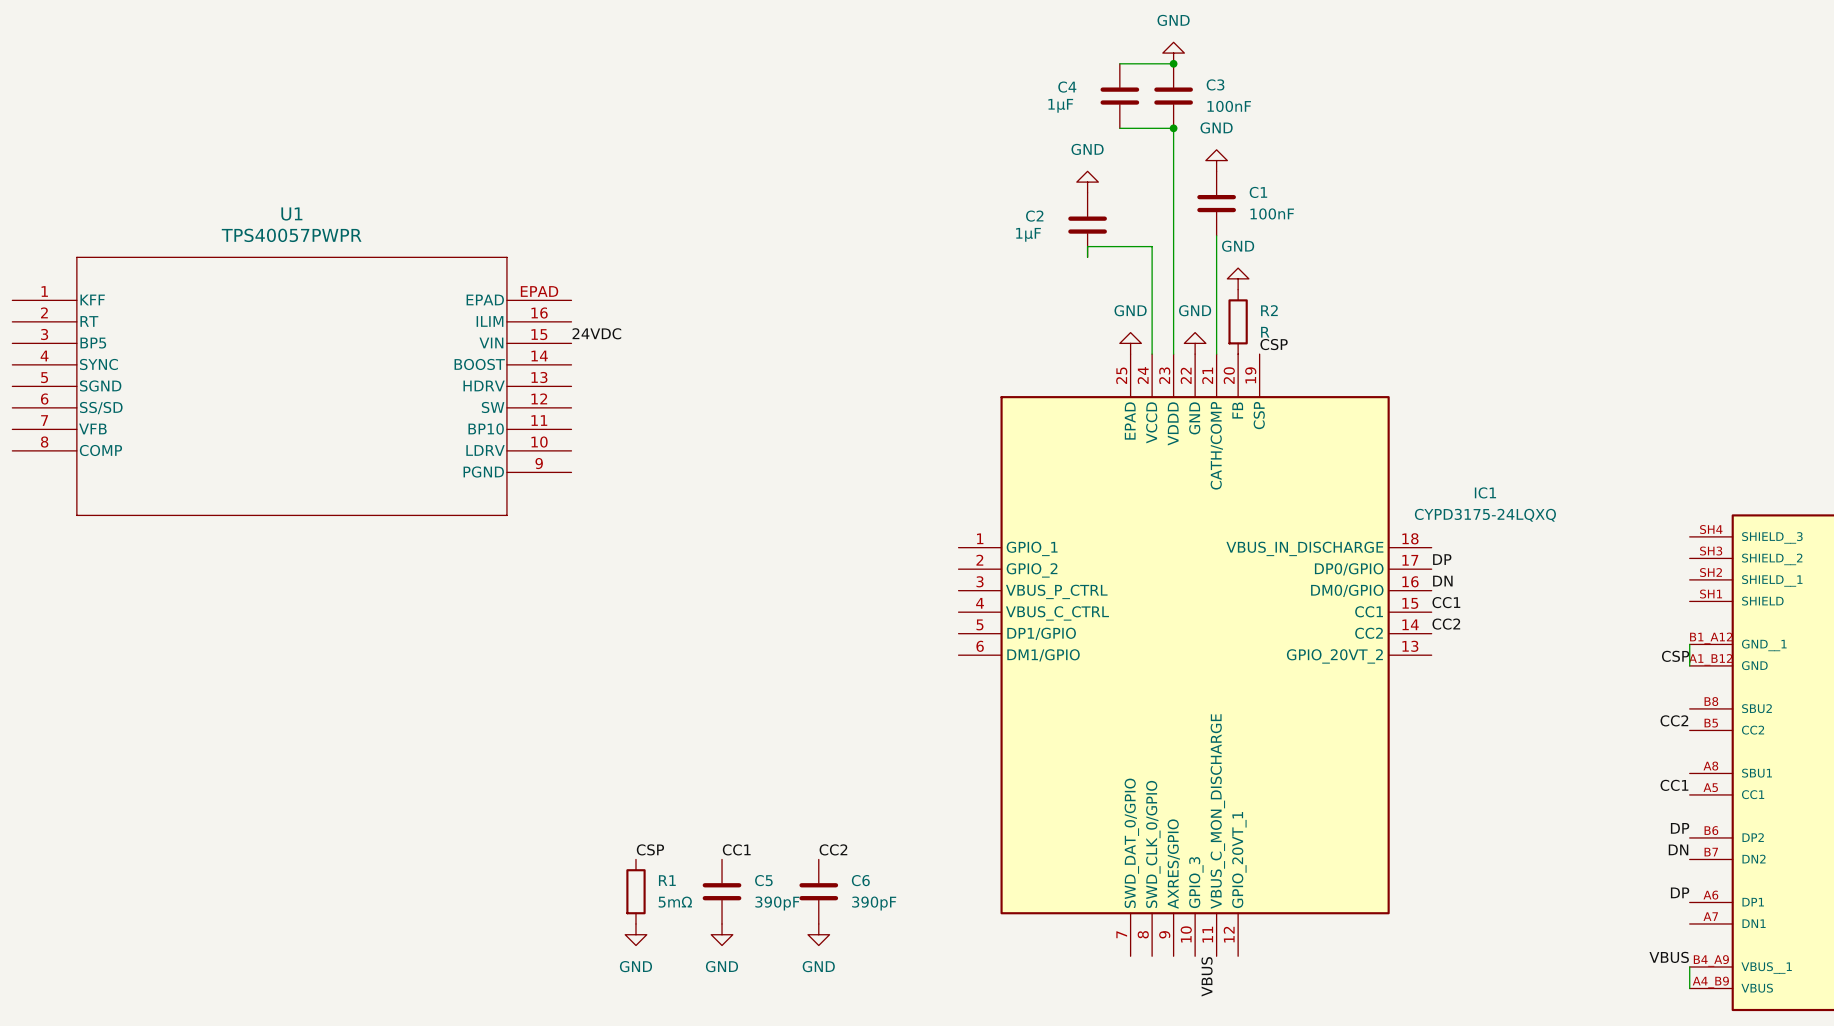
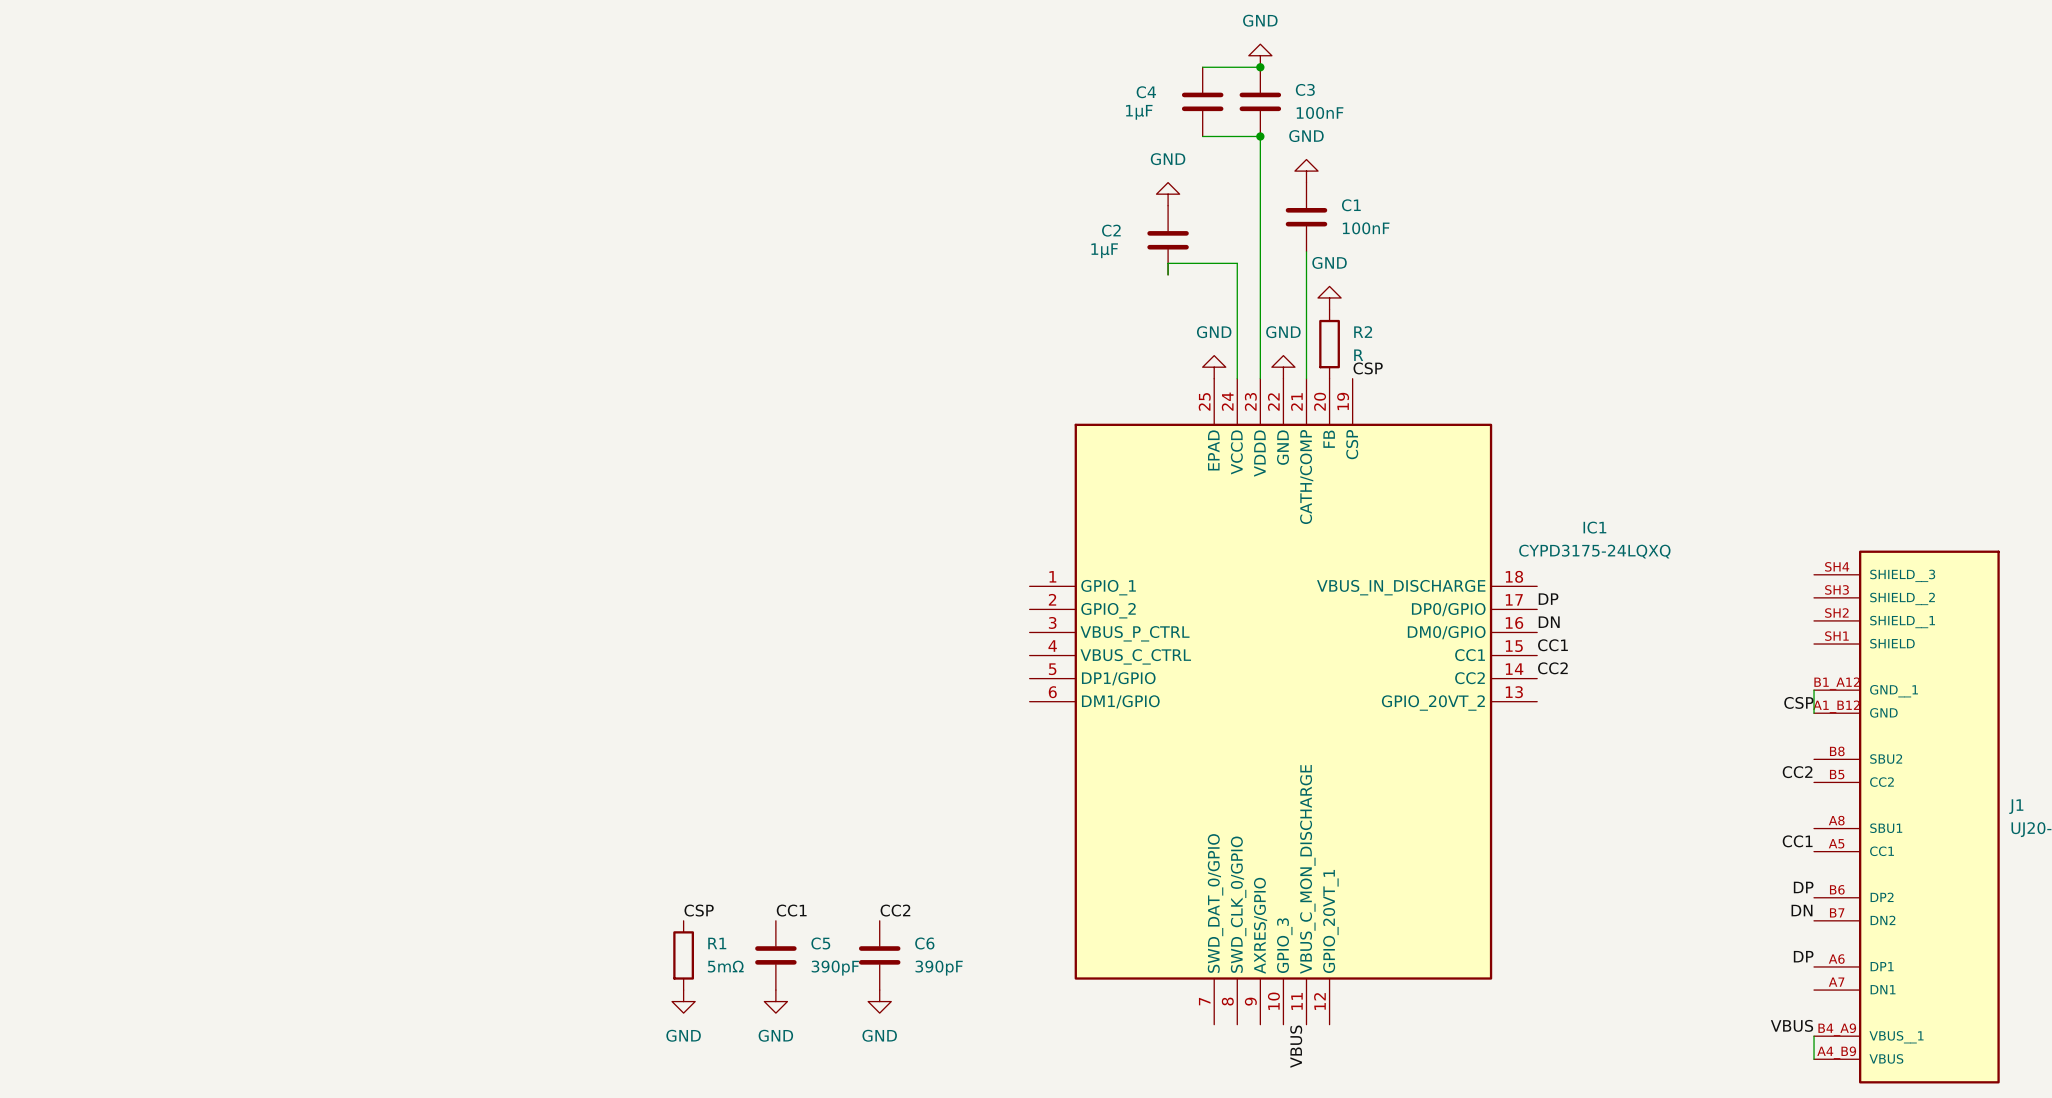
label: 24VDC (596, 333) -> none
U1: TPS40057PWPR (291, 386) -> none

